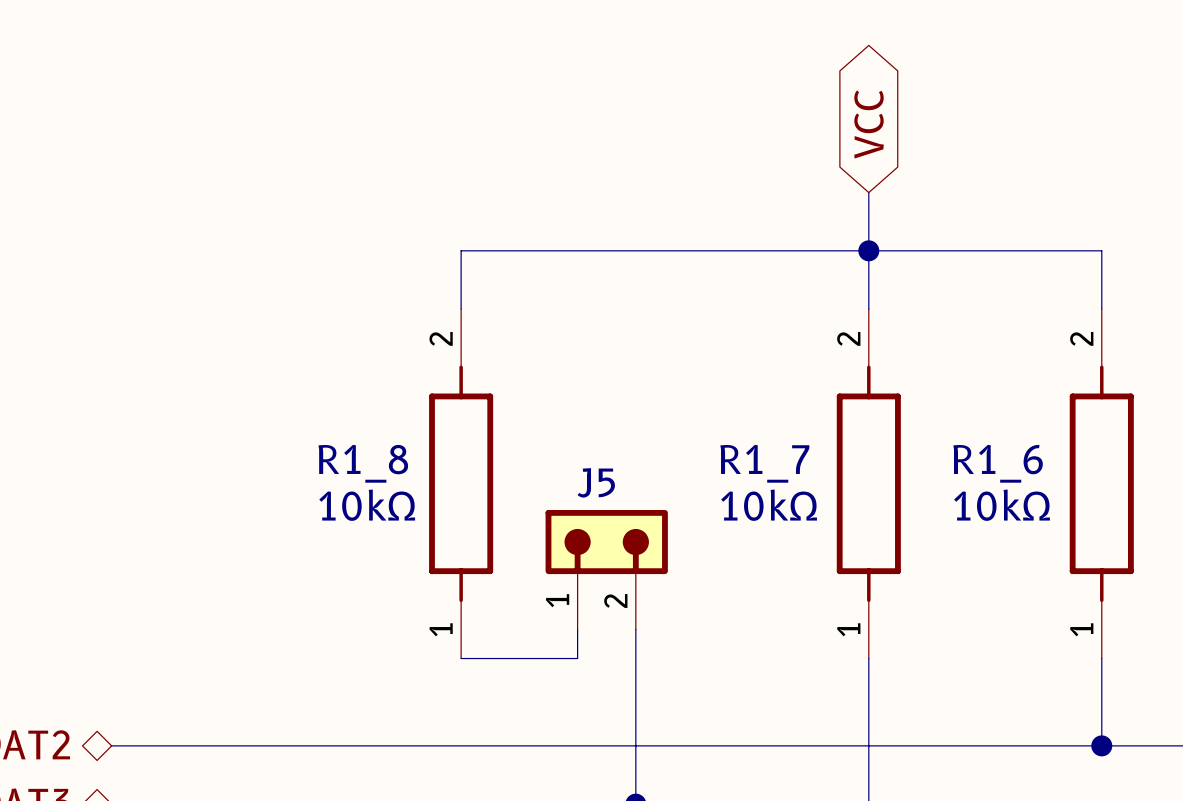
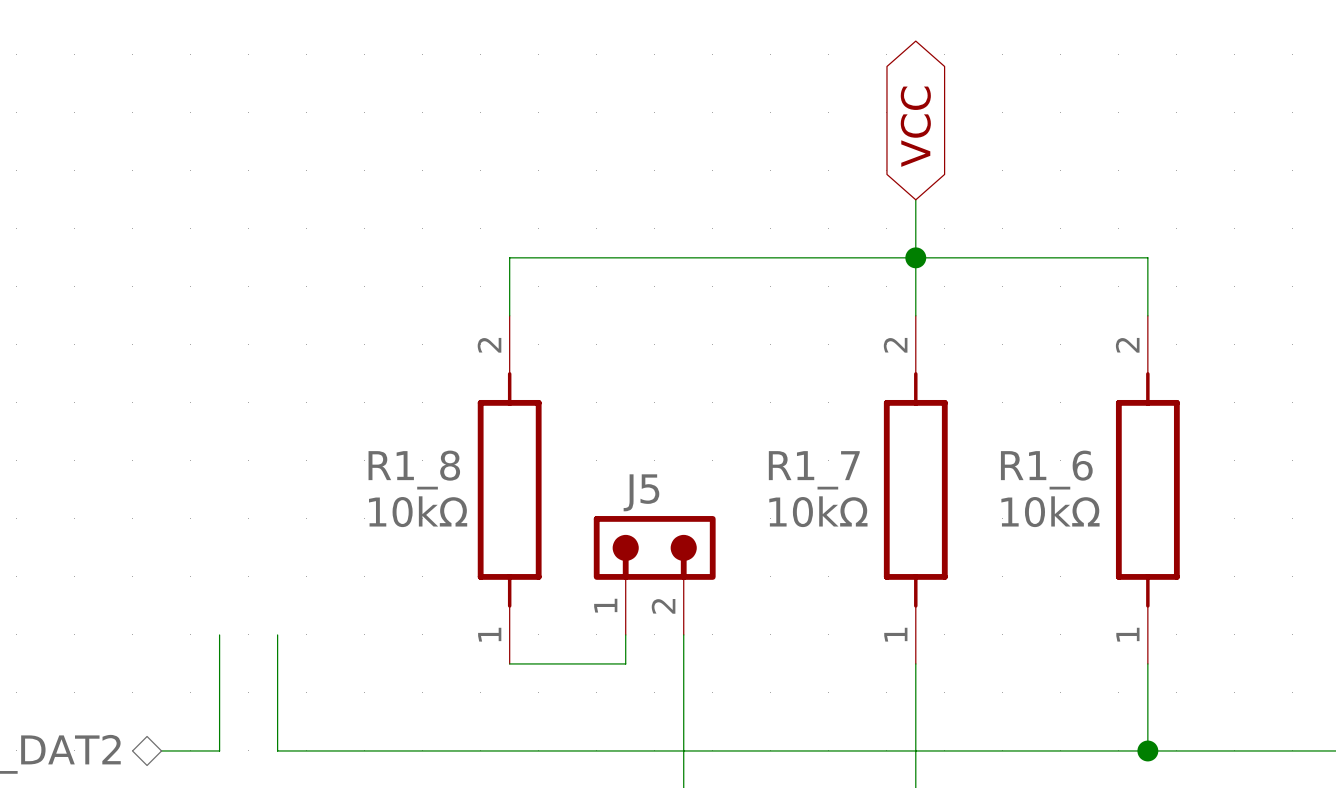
wire: none -> (277, 634) (277, 750)
wire: (169, 745) (228, 745) -> (219, 750) (219, 634)

